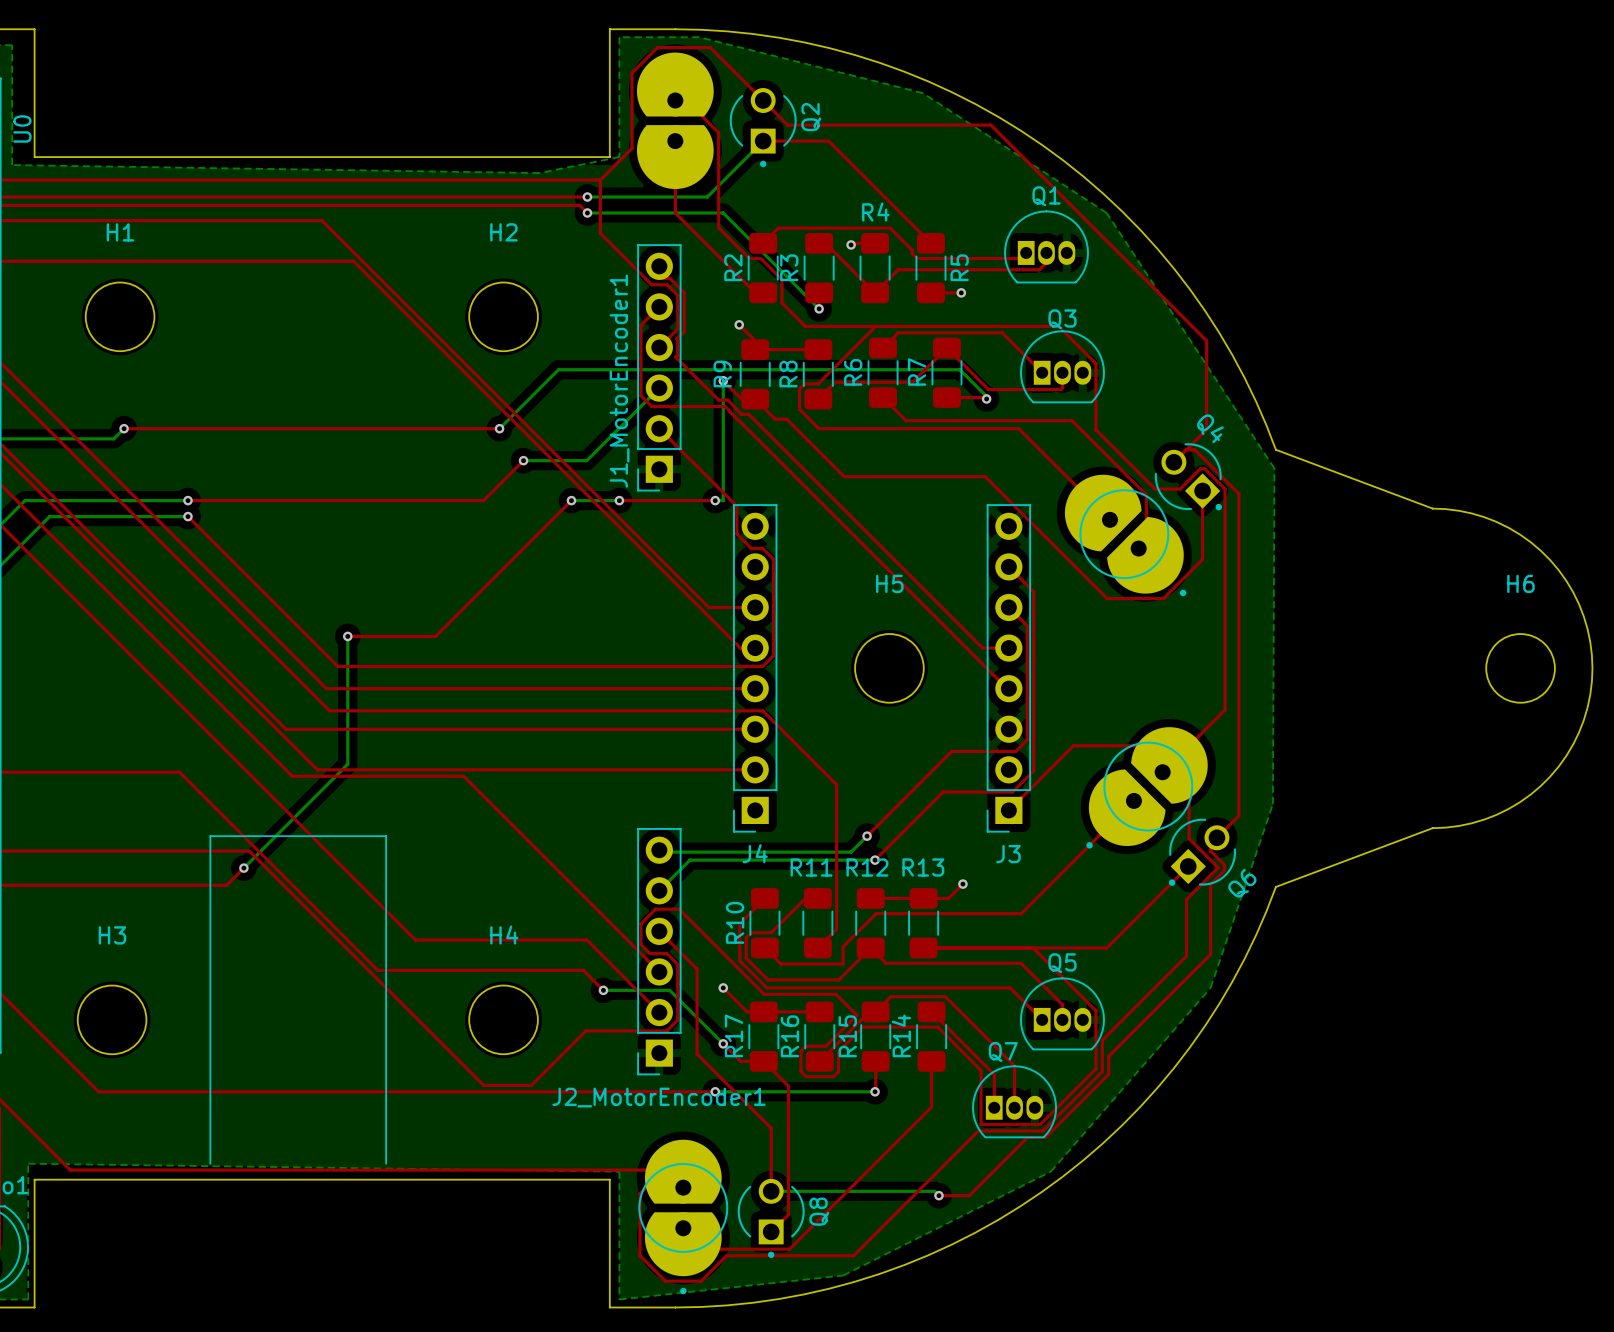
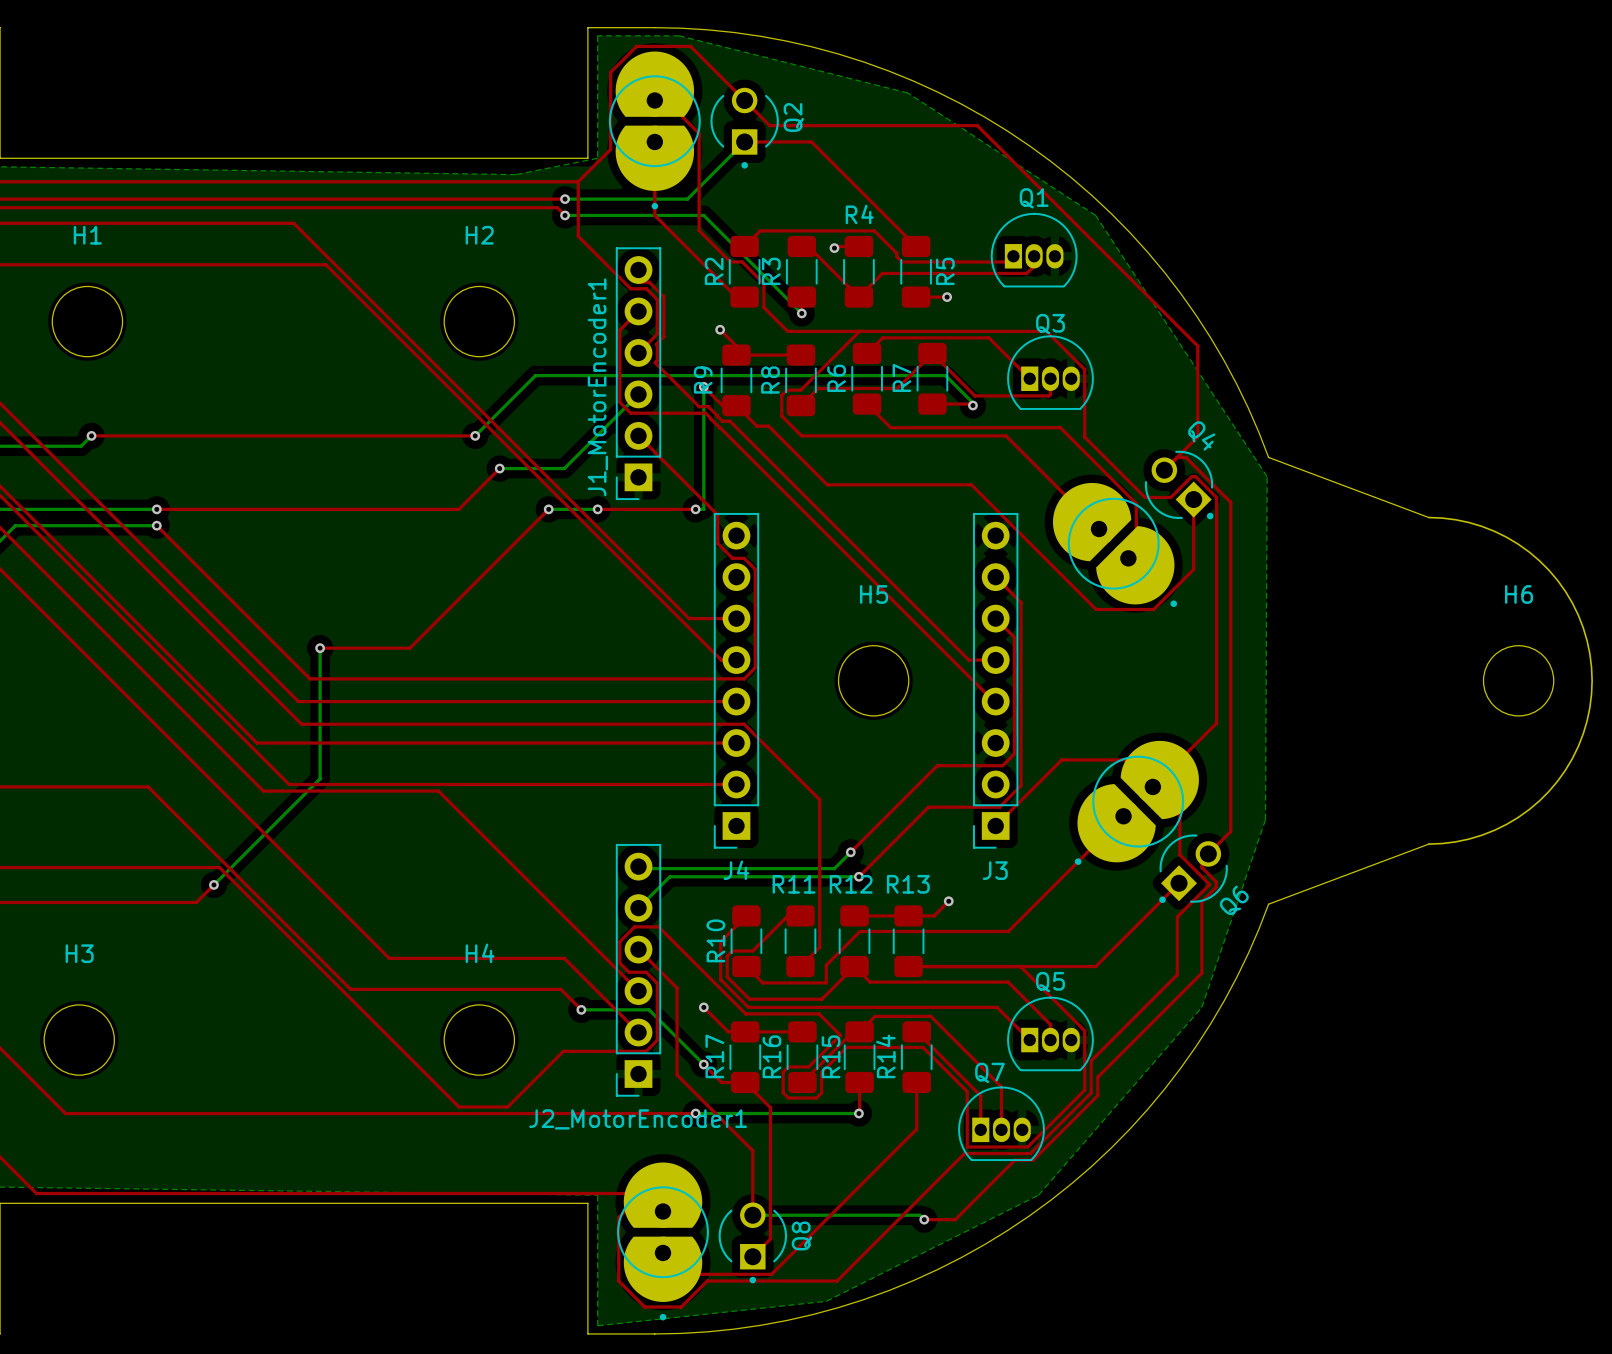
part footprint: [636, 52, 714, 190] -> [608, 51, 701, 210]
line: (210, 1163) (210, 836) (386, 836) (386, 1163) -> none

